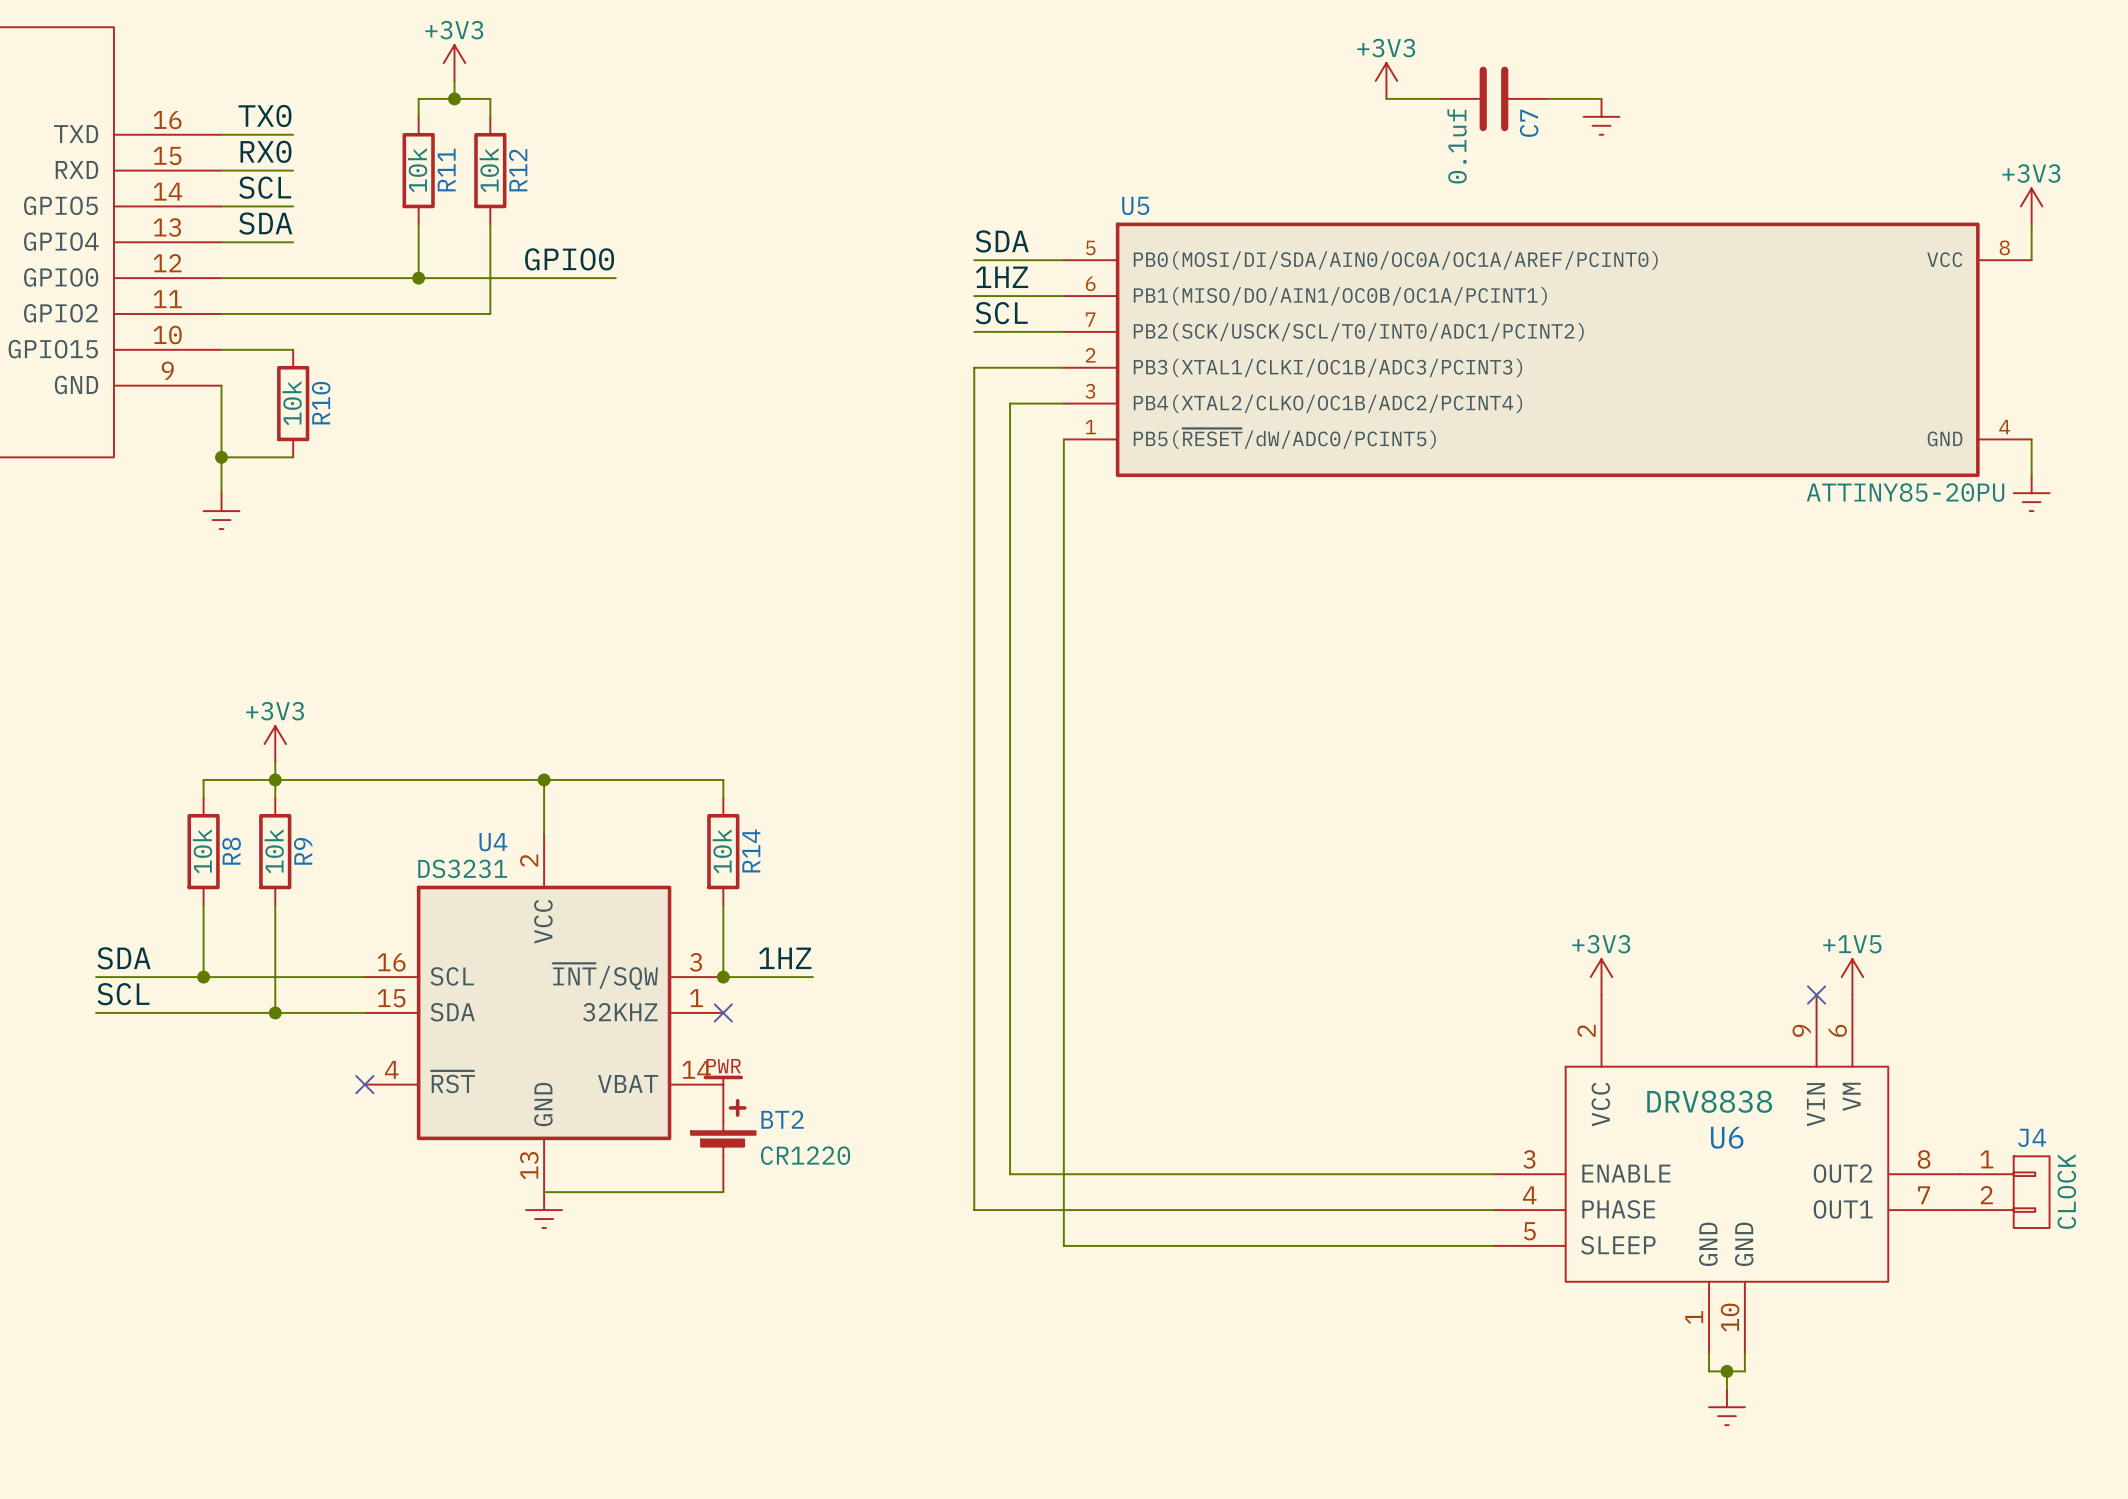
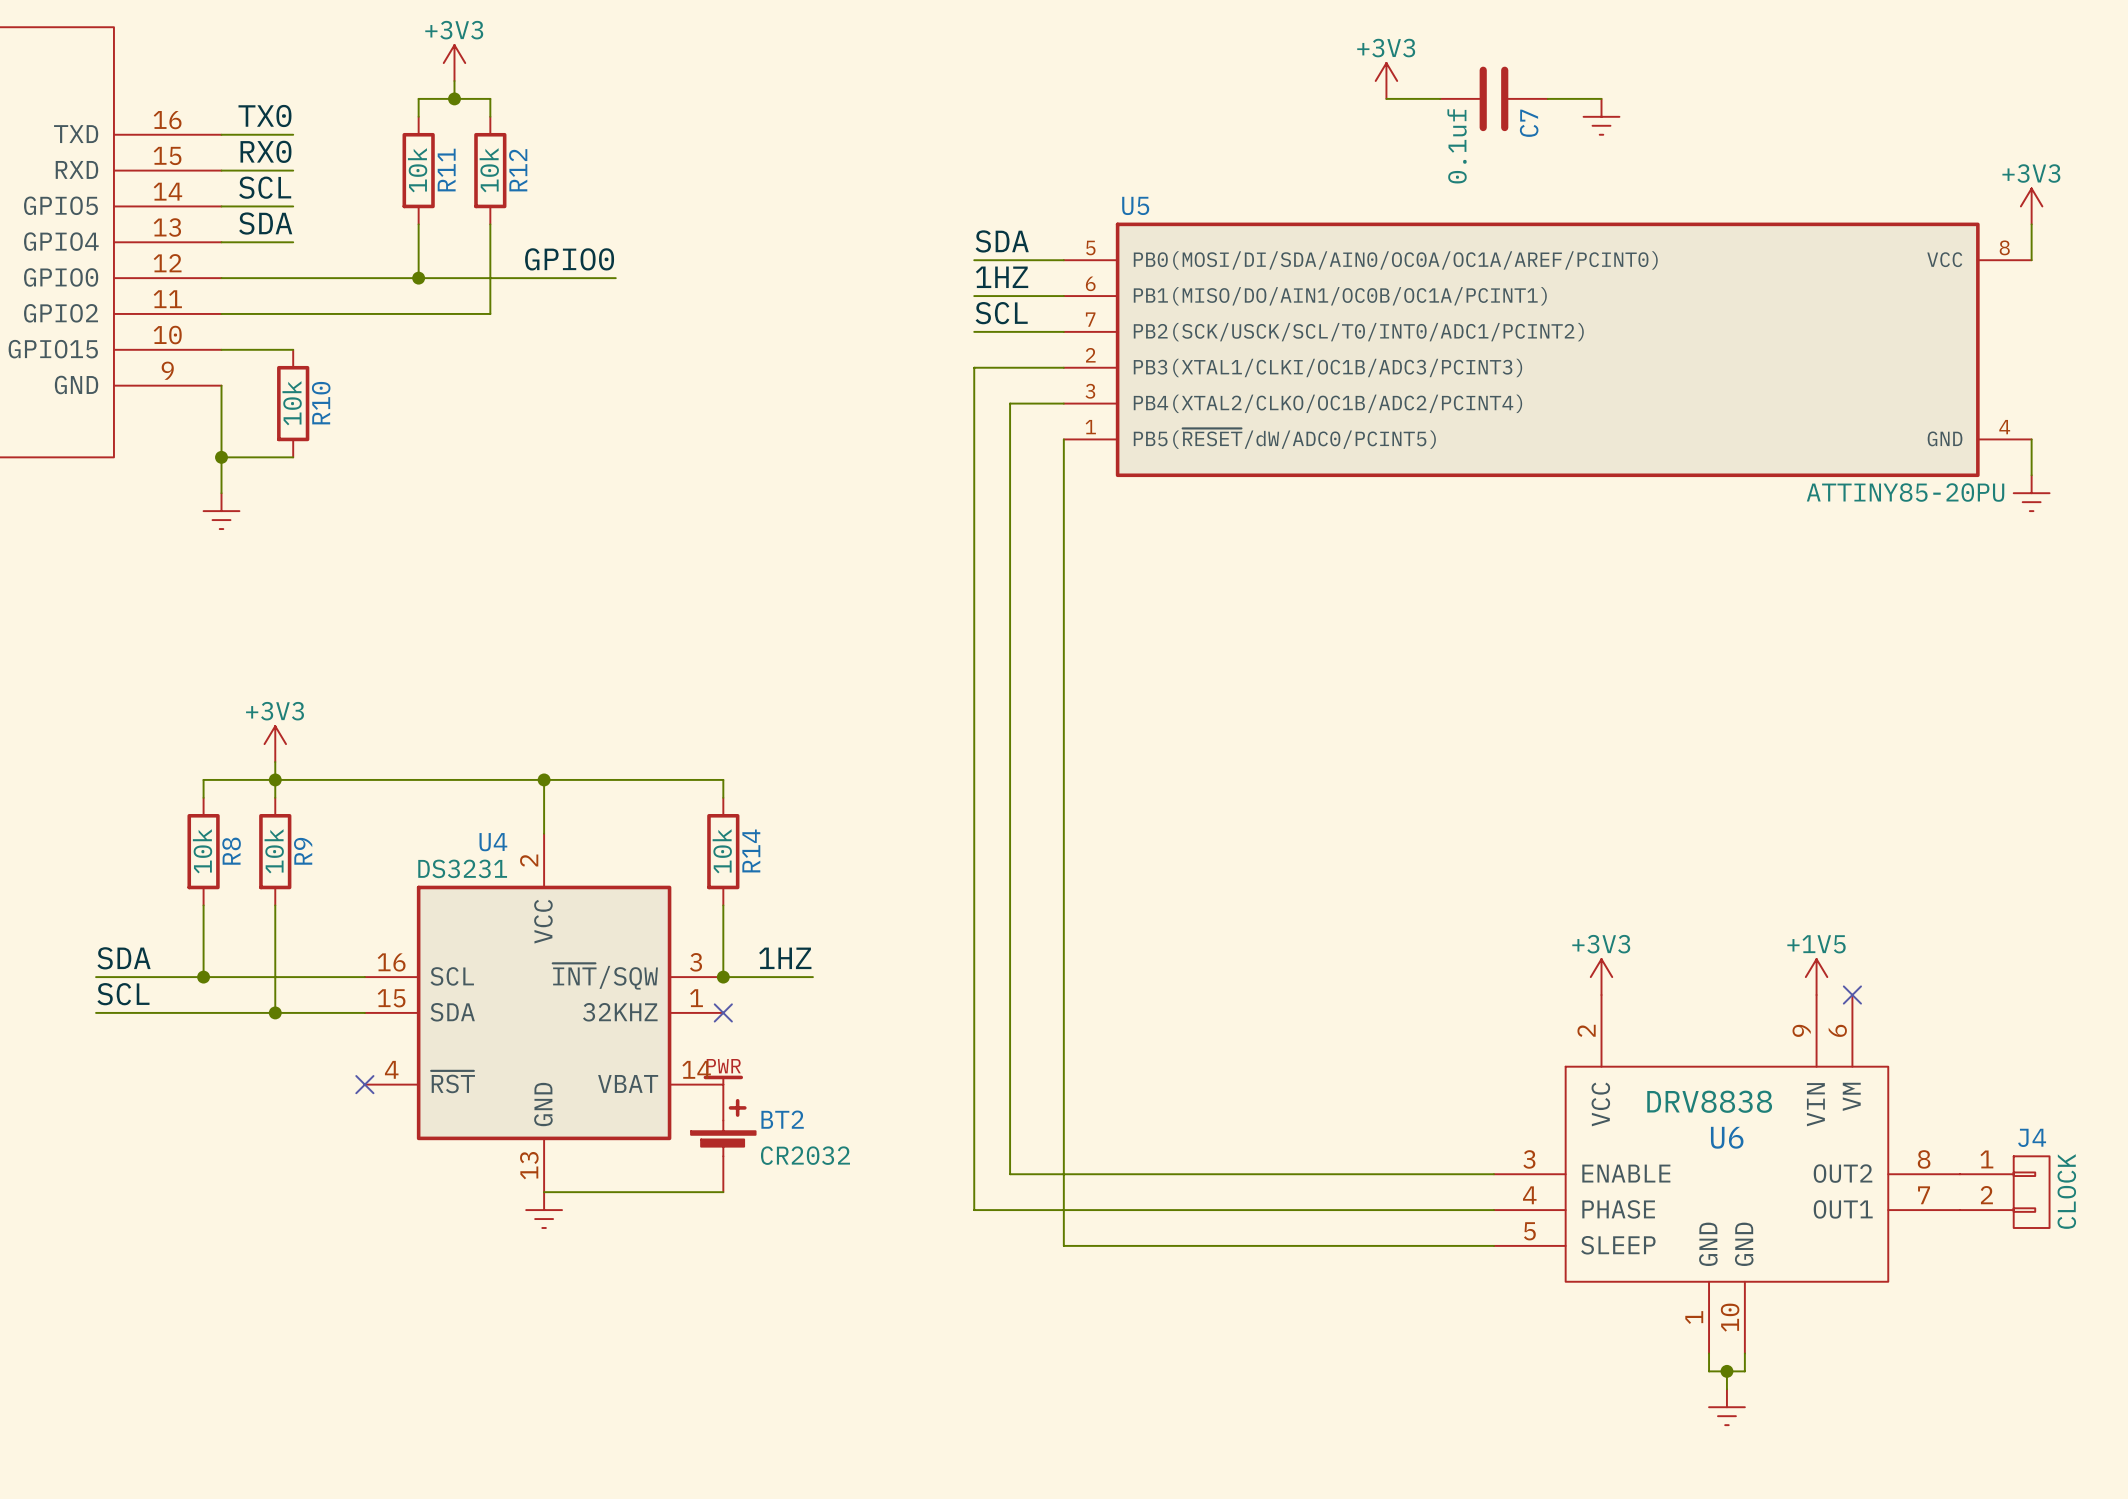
power symbol position: +1V5 (1852, 977) -> +1V5 (1816, 977)
no-connect mark position: (1816, 995) -> (1852, 995)
BT2 value: CR1220 (805, 1155) -> CR2032 (805, 1155)

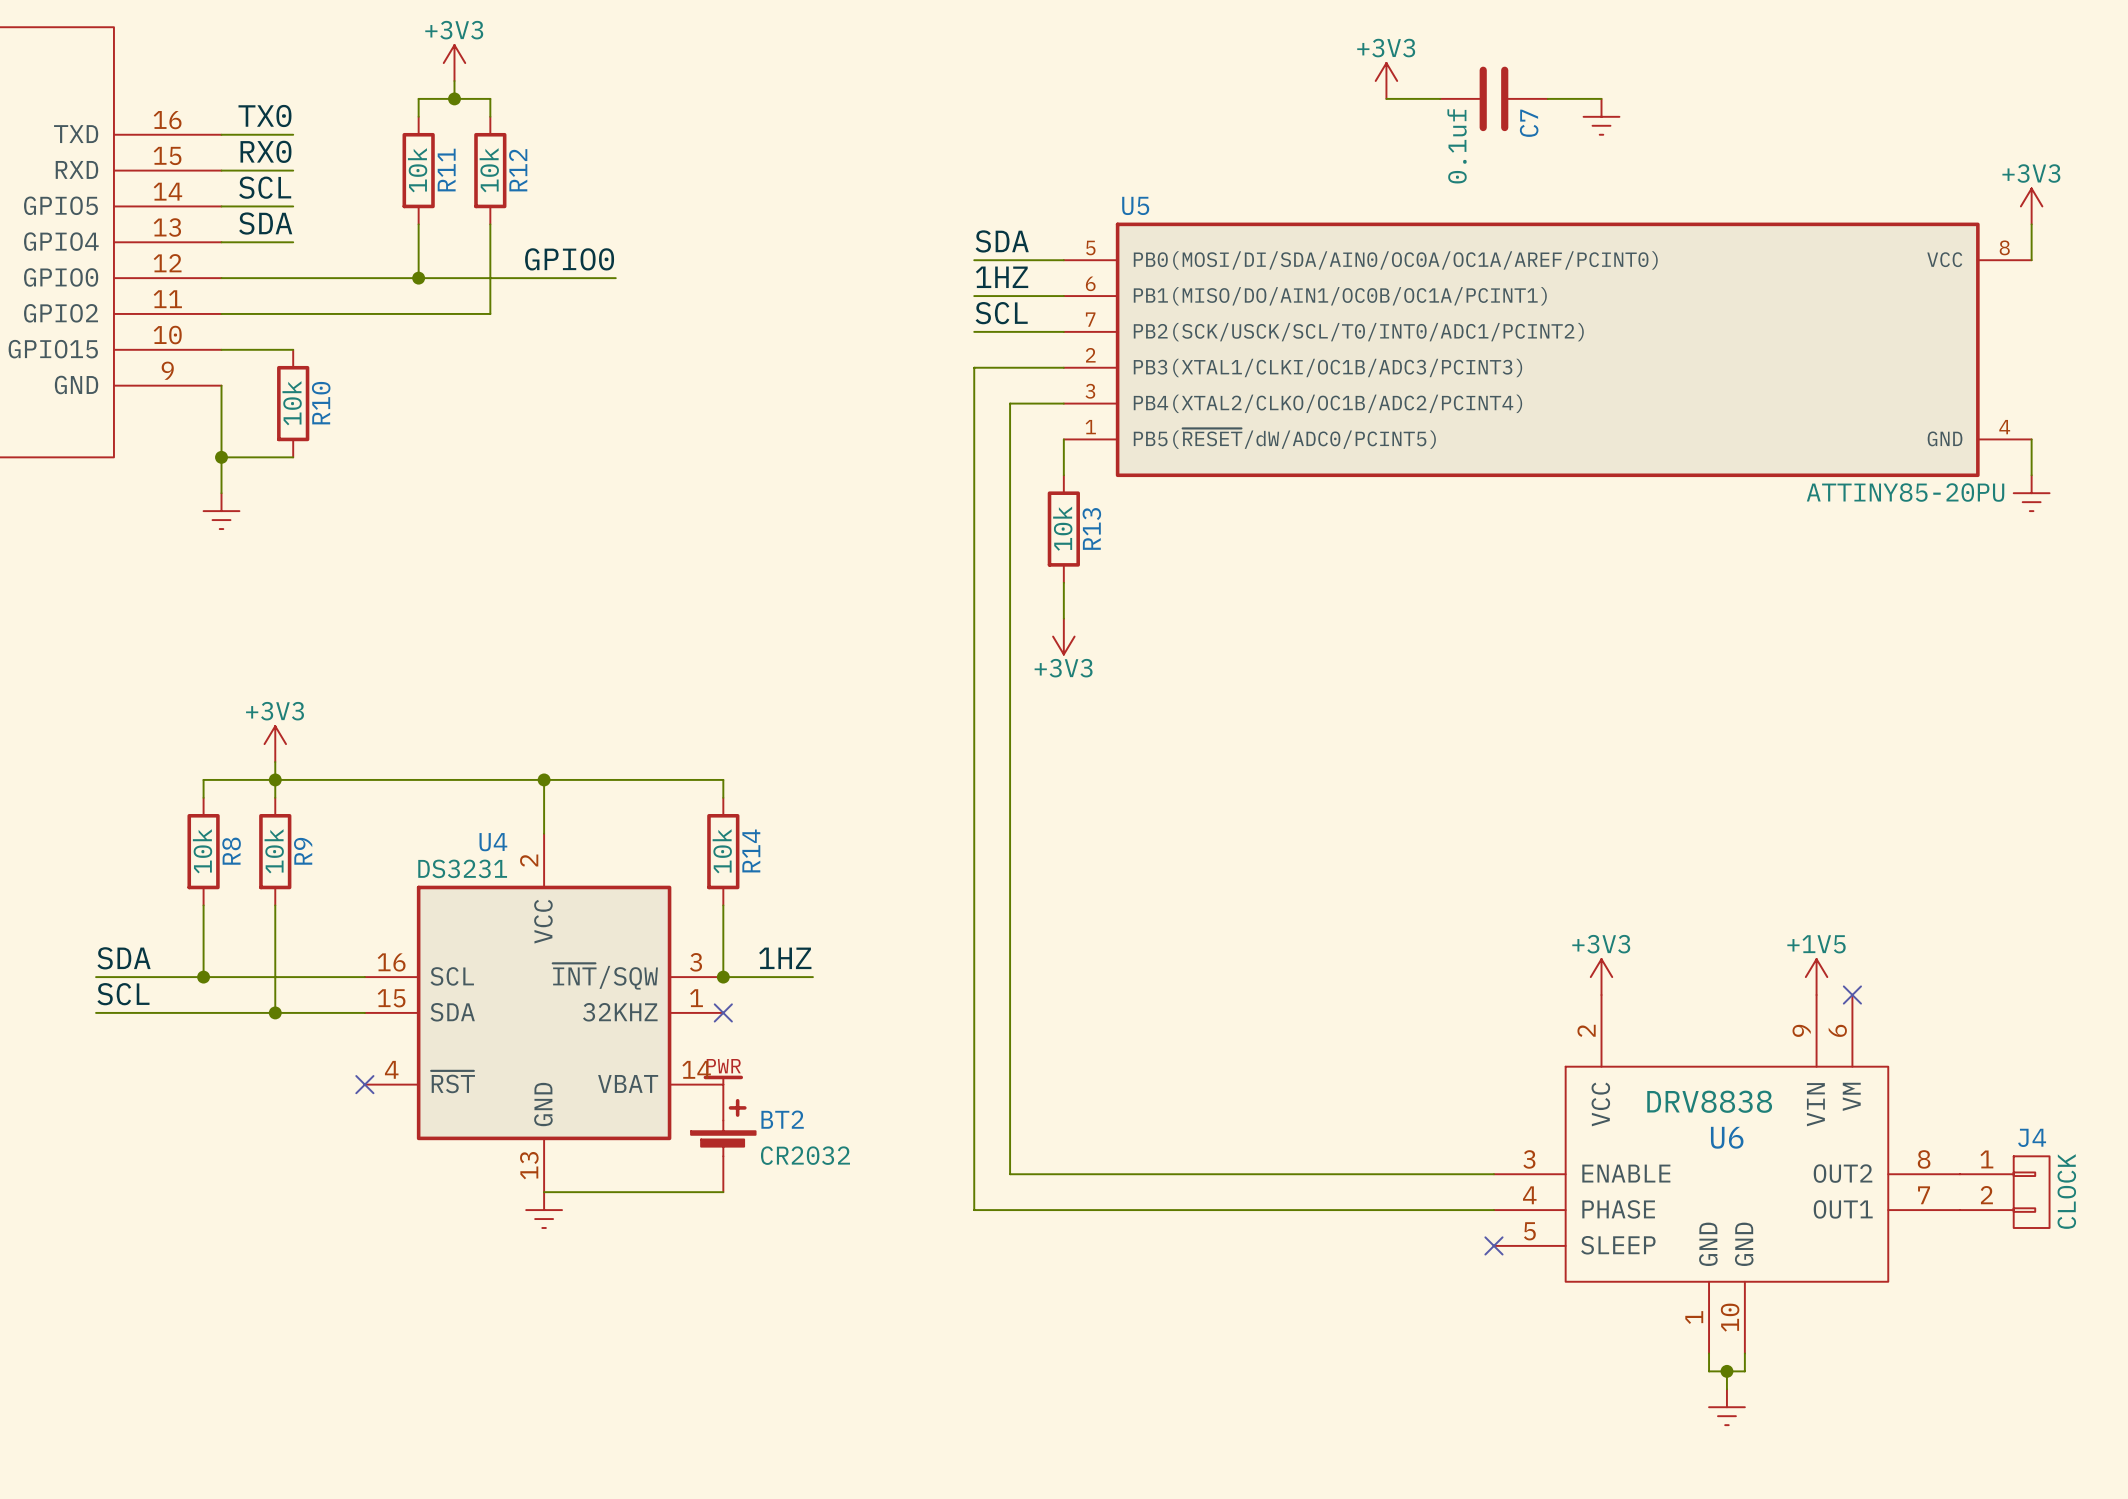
wire: (1063, 475) (1063, 582) -> none
R13: none -> 10k (1063, 529)
wire: (1063, 618) (1063, 1245) (1493, 1245) -> none
power symbol: none -> +3V3 (1063, 636)
no-connect mark: none -> (1493, 1245)

